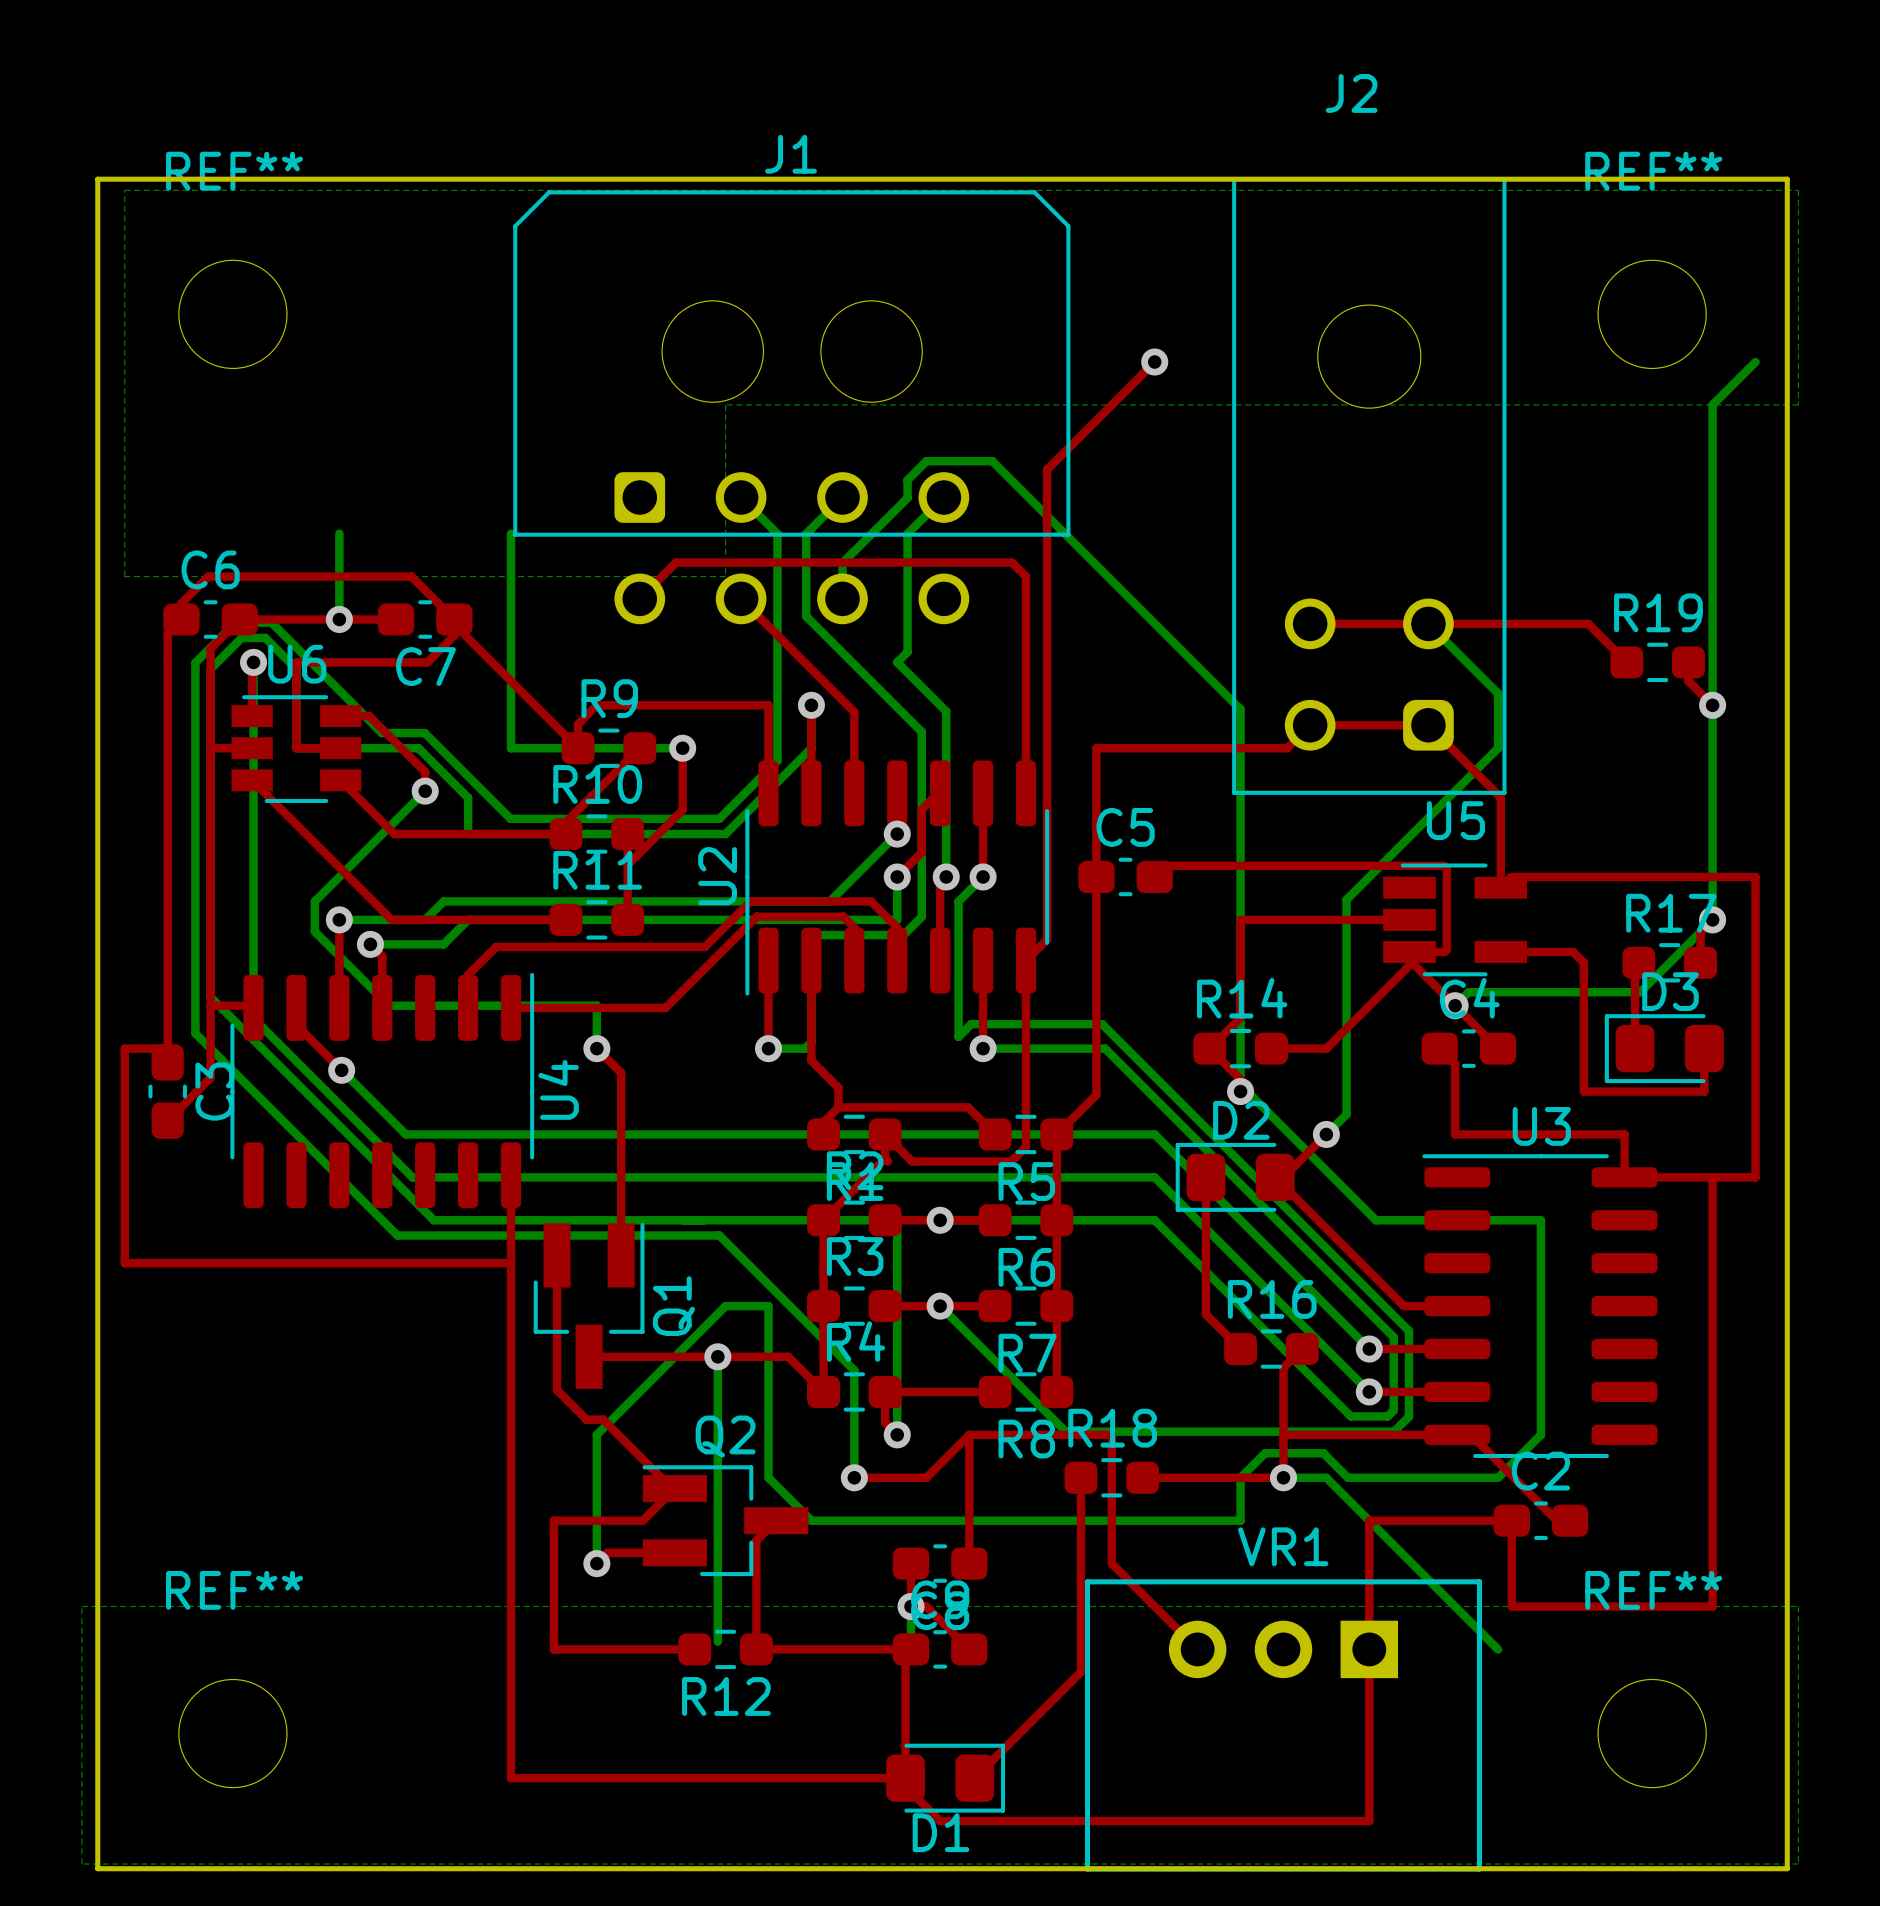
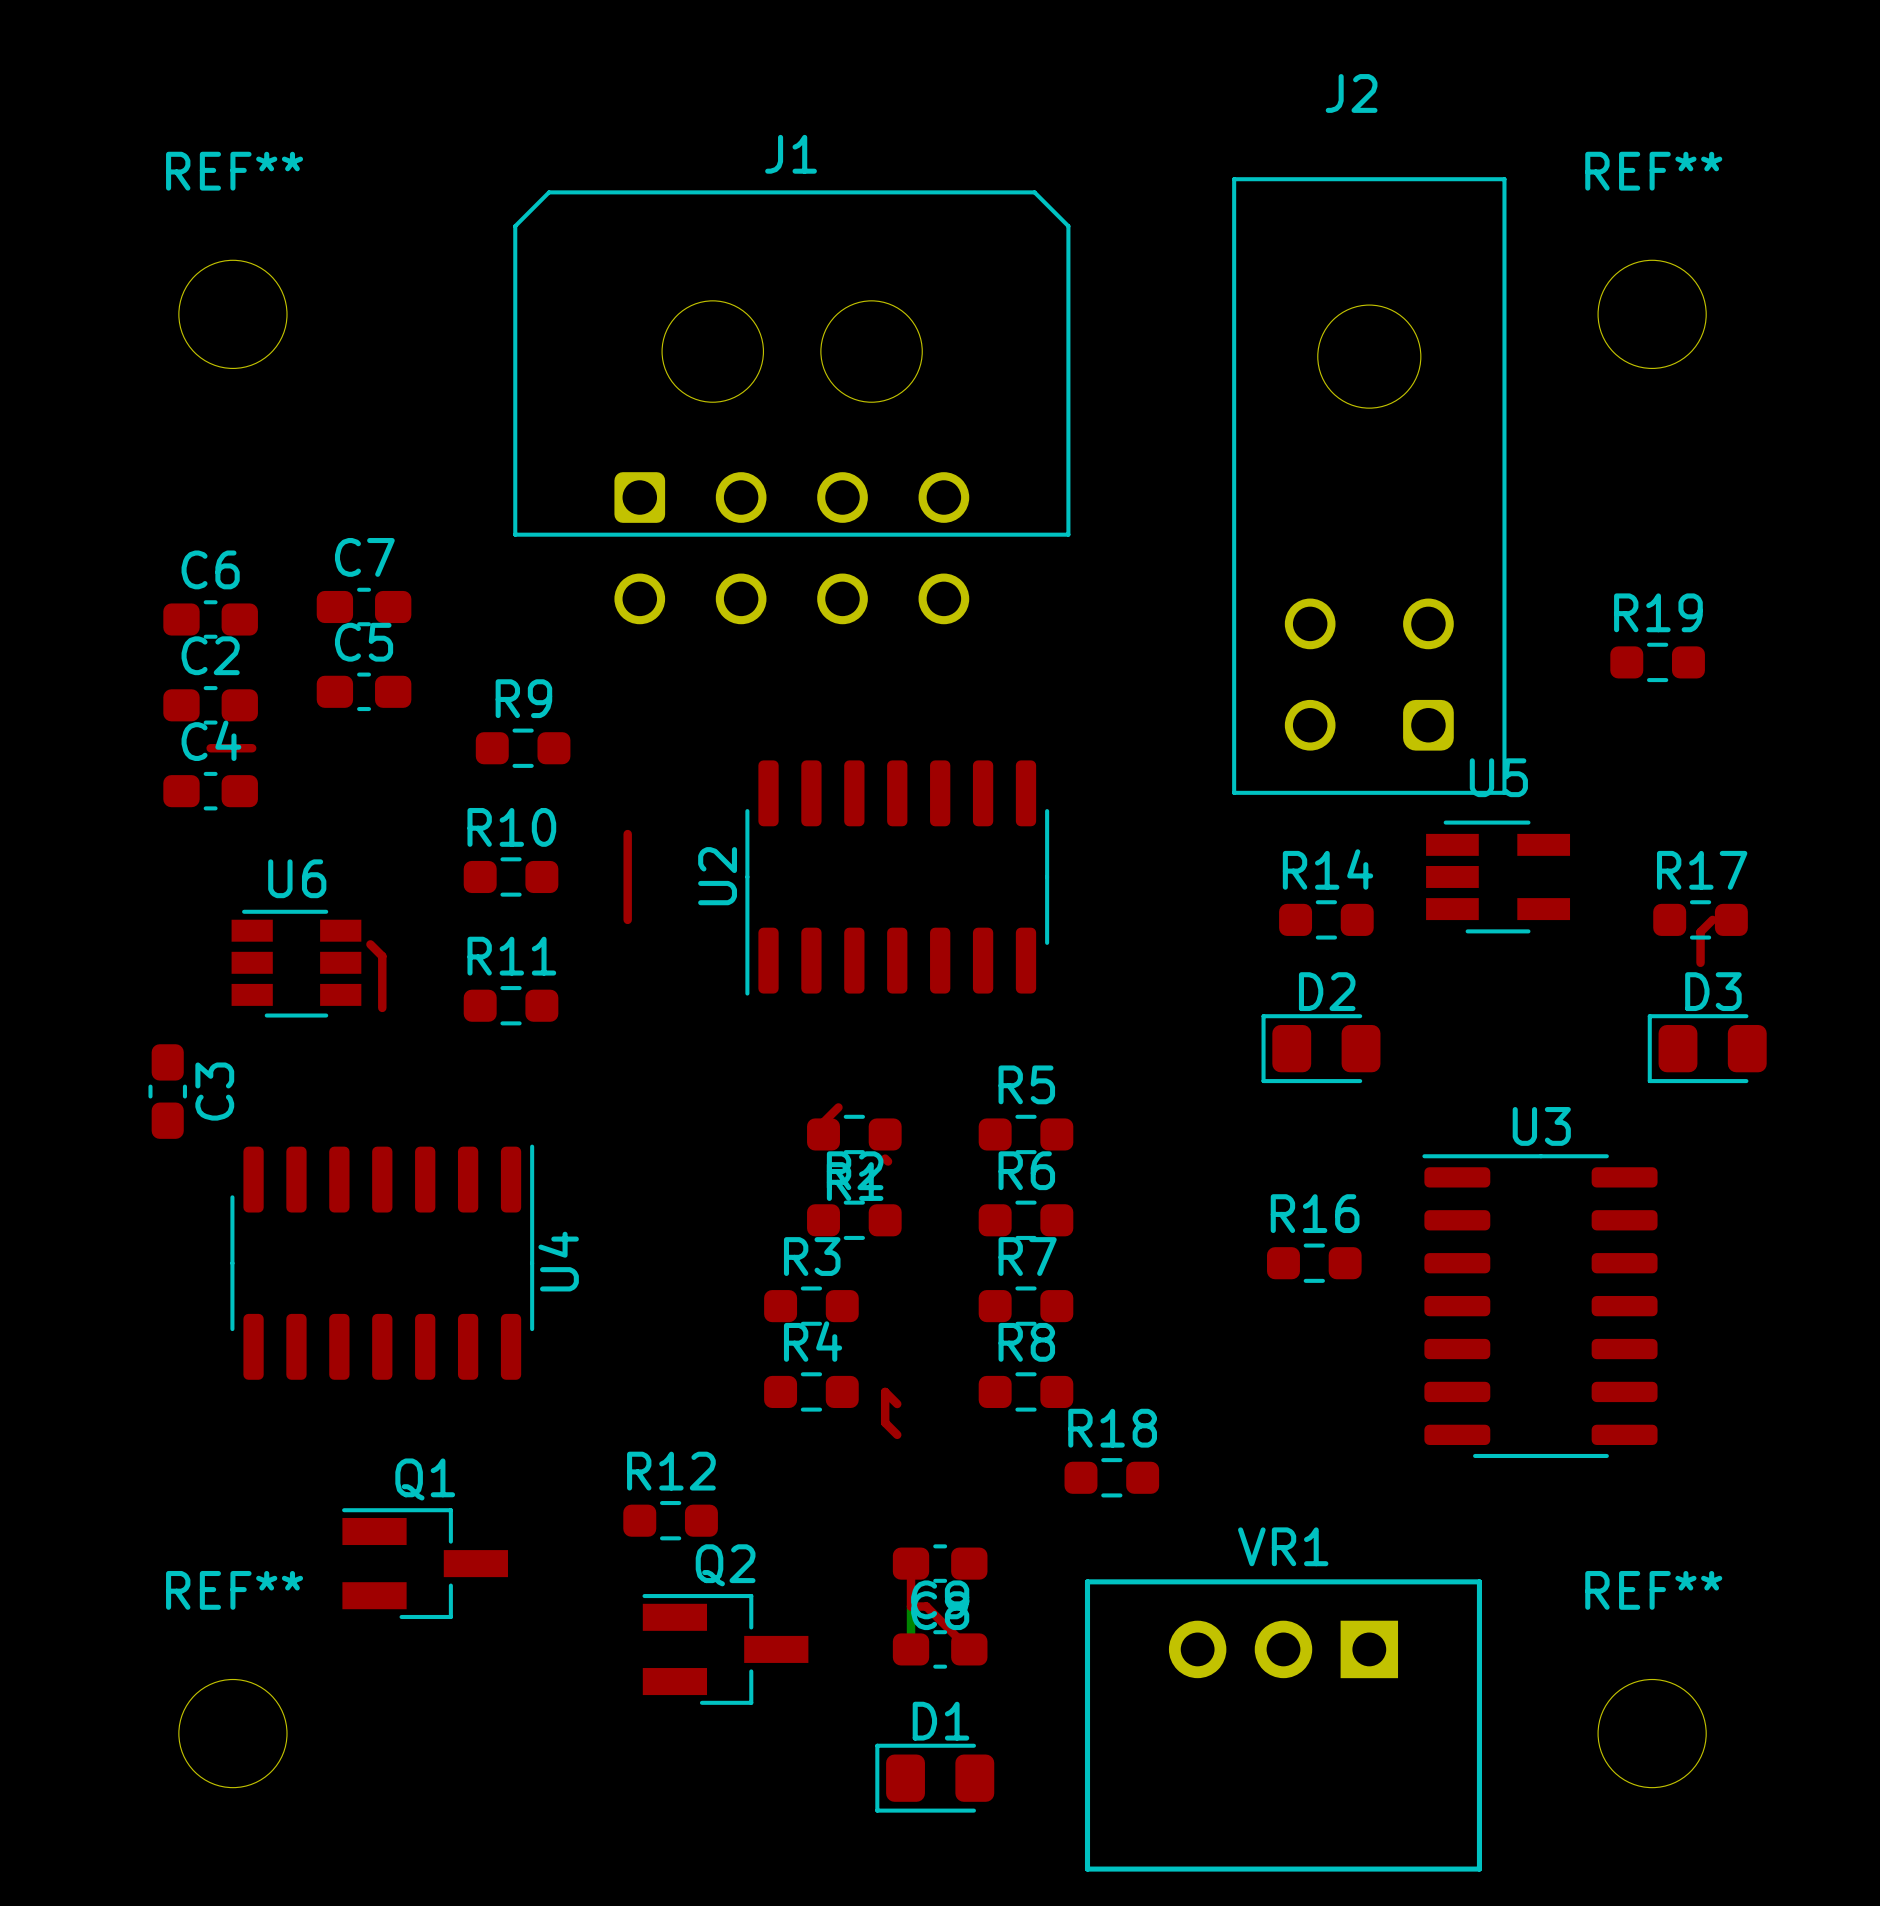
board edge: (97, 179) (1787, 179) (1787, 1868) (97, 1868) (97, 179) -> none
bottom zone outline: (124, 190) (124, 576) (725, 576) (725, 404) (1798, 404) (1798, 190) (124, 190) -> none
top track: (1154, 362) (1047, 469) (1047, 939) (1025, 960) (1025, 1146) (1011, 1161) (912, 1161) (885, 1134) (885, 1158) (823, 1220) (823, 1391) (788, 1356) (589, 1356) -> none
via: (1154, 362) -> none
bottom track: (1755, 362) (1712, 404) (1712, 919) (1640, 992) (1468, 992) (1455, 1005) -> none
bottom track: (741, 497) (777, 533) (777, 760) (719, 818) (510, 818) (424, 733) (381, 733) (271, 622) (235, 622) (195, 662) (195, 1033) (397, 1235) (719, 1235) (854, 1370) (854, 1477) -> none
bottom track: (842, 497) (806, 533) (806, 616) (921, 731) (921, 916) (903, 935) (811, 935) (811, 1041) (804, 1048) (768, 1048) -> none
bottom track: (943, 497) (907, 533) (907, 652) (897, 662) (946, 711) (946, 876) -> none
bottom track: (339, 533) (339, 619) -> none
bottom track: (511, 533) (511, 748) (682, 748) -> none
top track: (639, 598) (676, 562) (1011, 562) (1025, 576) (1025, 793) -> none
top track: (741, 598) (854, 712) (854, 793) -> none
bottom track: (842, 598) (842, 563) (907, 498) (907, 480) (926, 461) (992, 461) (1240, 709) (1240, 1091) (1247, 1091) (1375, 1220) (1540, 1220) (1540, 1434) (1498, 1477) (1347, 1477) (1323, 1453) (1265, 1453) (1240, 1477) (1240, 1520) (811, 1520) (768, 1477) (768, 1306) (725, 1306) (596, 1434) (596, 1563) -> none
via: (339, 619) -> none
top track: (396, 619) (239, 619) (210, 648) (210, 1077) (167, 1120) -> none
C7 position: (425, 619) -> (364, 606)
top track: (1310, 623) (1588, 623) (1626, 662) -> none
bottom track: (1428, 623) (1498, 693) (1498, 748) (1346, 899) (1346, 1114) (1326, 1134) -> none
top track: (454, 624) (578, 748) (578, 724) (596, 705) (768, 705) (768, 793) -> none
top track: (253, 662) (252, 716) -> none
bottom track: (253, 662) (253, 1018) (412, 1177) (1154, 1177) (1369, 1391) -> none
via: (253, 662) -> none
top track: (1688, 662) (1688, 681) (1712, 705) -> none
C7 name position: C7 (426, 666) -> C7 (364, 557)
top track: (811, 705) (811, 793) -> none
bottom track: (811, 705) (811, 748) (725, 834) (468, 834) (468, 797) (418, 748) (296, 748) (296, 669) (265, 637) (241, 637) (210, 669) (210, 997) (433, 1220) (897, 1220) (897, 1434) -> none
via: (811, 705) -> none
via: (1712, 705) -> none
top track: (340, 716) (369, 716) (425, 772) (425, 791) -> none
top track: (340, 748) (296, 748) (296, 662) (427, 662) (454, 635) (454, 619) (411, 576) (208, 576) (181, 603) (181, 619) (167, 633) (167, 1048) (124, 1048) (124, 1263) (511, 1263) -> none
R9 position: (608, 748) -> (523, 748)
top track: (639, 748) (566, 821) (566, 834) (394, 834) (340, 780) -> none
top track: (682, 748) (682, 809) (627, 864) -> none
via: (682, 748) -> none
U6 position: (296, 749) -> (296, 963)
top track: (252, 780) (391, 919) (566, 919) -> none
bottom track: (425, 791) (314, 901) (314, 931) (388, 1005) (596, 1005) (596, 1048) -> none
via: (425, 791) -> none
top track: (940, 793) (921, 809) (921, 852) (897, 876) -> none
top track: (983, 793) (983, 876) -> none
R10 position: (596, 834) -> (511, 876)
bottom track: (897, 834) (829, 901) (443, 901) (425, 919) (339, 919) -> none
via: (897, 834) -> none
bottom track: (897, 876) (897, 919) (468, 919) (443, 944) (370, 944) -> none
via: (897, 876) -> none
top track: (946, 876) (940, 883) (940, 960) -> none
via: (946, 876) -> none
bottom track: (983, 876) (958, 901) (958, 1036) (971, 1024) (1102, 1024) (1409, 1330) (1409, 1416) (1394, 1431) (1065, 1431) (940, 1306) -> none
via: (983, 876) -> none
C5 position: (1125, 876) -> (364, 691)
top track: (1154, 876) (1165, 865) (1443, 865) (1446, 868) (1446, 949) (1444, 951) (1409, 951) (1409, 965) (1326, 1048) (1271, 1048) -> none
top track: (339, 919) (339, 1007) -> none
via: (339, 919) -> none
R11 position: (596, 919) -> (511, 1005)
top track: (1409, 919) (1240, 919) (1240, 1017) (1209, 1048) (1240, 1079) (1240, 1091) -> none
U5 position: (1455, 919) -> (1498, 876)
via: (1712, 919) -> none
via: (370, 944) -> none
top track: (1500, 951) (1573, 951) (1583, 962) (1583, 1091) (1704, 1091) (1704, 1048) (1712, 1048) -> none
top track: (768, 960) (768, 1048) -> none
top track: (811, 960) (811, 1060) (838, 1087) (838, 1107) (968, 1107) (995, 1134) -> none
top track: (854, 960) (854, 927) (843, 916) (756, 916) (665, 1007) (511, 1007) -> none
top track: (897, 960) (897, 927) (871, 901) (750, 901) (705, 946) (496, 946) (468, 974) (468, 1007) -> none
top track: (983, 960) (983, 1048) -> none
top track: (1409, 960) (1498, 1048) -> none
top track: (1638, 962) (1635, 966) (1635, 1048) -> none
R17 position: (1669, 962) -> (1700, 919)
top track: (210, 1005) (251, 1005) (253, 1007) -> none
via: (1455, 1005) -> none
top track: (296, 1007) (296, 1025) (341, 1070) -> none
top track: (596, 1048) (621, 1072) (621, 1255) -> none
via: (596, 1048) -> none
via: (768, 1048) -> none
bottom track: (983, 1048) (1105, 1048) (1393, 1337) (1393, 1410) (1387, 1416) (1350, 1416) (1154, 1220) (940, 1220) -> none
via: (983, 1048) -> none
R14 position: (1240, 1048) -> (1326, 919)
top track: (1439, 1048) (1455, 1064) (1455, 1134) (1624, 1134) (1624, 1177) -> none
C4 position: (1468, 1048) -> (210, 791)
D3 position: (1664, 1048) -> (1707, 1048)
bottom track: (341, 1070) (405, 1134) (1154, 1134) (1369, 1349) -> none
via: (341, 1070) -> none
U4 position: (382, 1090) -> (382, 1262)
via: (1240, 1091) -> none
top track: (1326, 1134) (1283, 1177) (1275, 1177) (1403, 1306) (1457, 1306) -> none
via: (1326, 1134) -> none
top track: (511, 1175) (511, 1778) (905, 1778) -> none
top track: (1205, 1177) (1205, 1314) (1240, 1349) -> none
D2 position: (1235, 1177) -> (1320, 1048)
top track: (1611, 1177) (1755, 1177) (1755, 876) (1511, 876) (1500, 887) (1500, 797) (1428, 725) (1310, 725) (1287, 748) (1096, 748) (1096, 1094) (1056, 1134) (1056, 1391) -> none
top track: (1712, 1177) (1712, 1606) (1511, 1606) (1511, 1520) (1369, 1520) (1369, 1821) (940, 1821) (905, 1786) (905, 1654) (911, 1649) (756, 1649) (756, 1540) (776, 1520) -> none
R5 name position: R5 (1026, 1181) -> R5 (1026, 1084)
top track: (885, 1220) (995, 1220) -> none
via: (940, 1220) -> none
top track: (556, 1255) (556, 1390) (586, 1419) (603, 1419) (672, 1488) (674, 1488) (642, 1520) (553, 1520) (553, 1649) (694, 1649) -> none
R6 name position: R6 (1026, 1267) -> R6 (1026, 1170)
Q1 rotation: 0° (589, 1305) -> 90° counterclockwise (425, 1563)
Q1 position: (589, 1305) -> (425, 1563)
R3 position: (854, 1306) -> (811, 1306)
top track: (885, 1306) (995, 1306) -> none
via: (940, 1306) -> none
R16 position: (1271, 1349) -> (1314, 1263)
top track: (1302, 1349) (1283, 1367) (1283, 1477) (1142, 1477) -> none
top track: (1369, 1349) (1457, 1349) -> none
via: (1369, 1349) -> none
R7 name position: R7 (1027, 1353) -> R7 (1027, 1256)
bottom track: (717, 1356) (717, 1641) -> none
via: (717, 1356) -> none
R4 position: (854, 1391) -> (811, 1391)
top track: (885, 1391) (995, 1391) -> none
top track: (1369, 1391) (1457, 1391) -> none
via: (1369, 1391) -> none
via: (897, 1434) -> none
top track: (969, 1434) (1111, 1434) (1111, 1563) (1197, 1649) -> none
top track: (969, 1434) (969, 1563) -> none
top track: (969, 1434) (926, 1477) (854, 1477) -> none
top track: (1283, 1434) (1471, 1434) (1556, 1520) (1570, 1520) -> none
R8 name position: R8 (1026, 1439) -> R8 (1026, 1342)
via: (854, 1477) -> none
top track: (1080, 1477) (1080, 1671) (974, 1778) -> none
bottom track: (1283, 1477) (1326, 1477) (1498, 1649) -> none
via: (1283, 1477) -> none
Q2 position: (725, 1520) -> (725, 1649)
C2 position: (1540, 1520) -> (210, 705)
top track: (674, 1552) (607, 1552) (596, 1563) -> none
via: (596, 1563) -> none
bottom zone outline: (81, 1606) (81, 1864) (1798, 1864) (1798, 1606) (81, 1606) -> none
via: (911, 1606) -> none
R12 position: (725, 1649) -> (670, 1520)
R12 name position: R12 (726, 1696) -> R12 (671, 1471)
D1 rotation: 0° (945, 1778) -> 180° (934, 1778)

